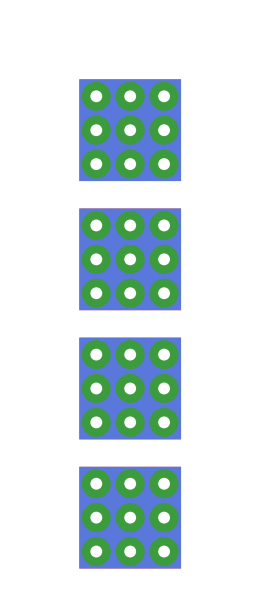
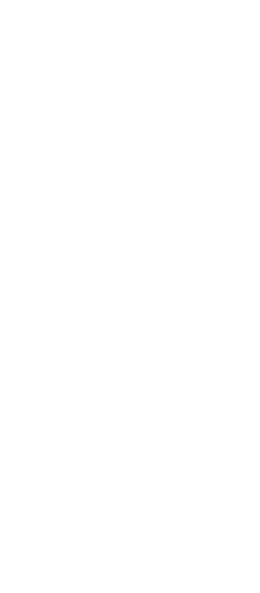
part: (130, 130) -> none
part: (130, 259) -> none
part: (130, 388) -> none
part: (130, 517) -> none

